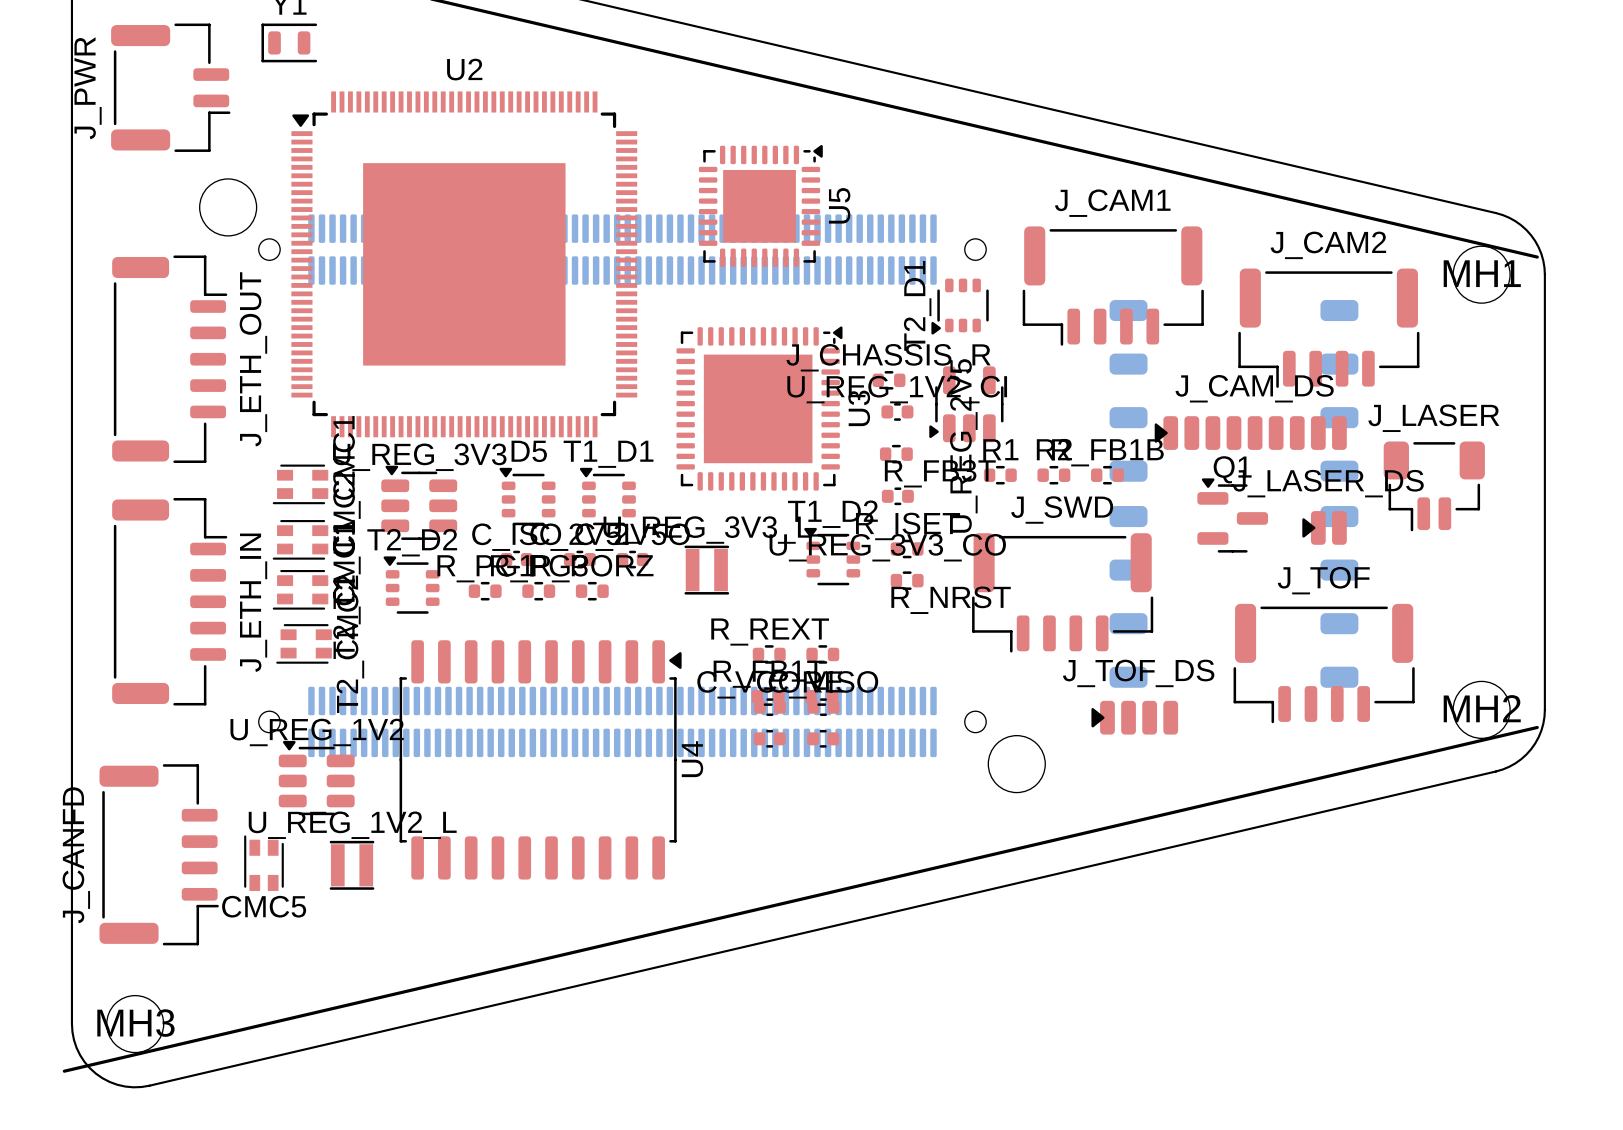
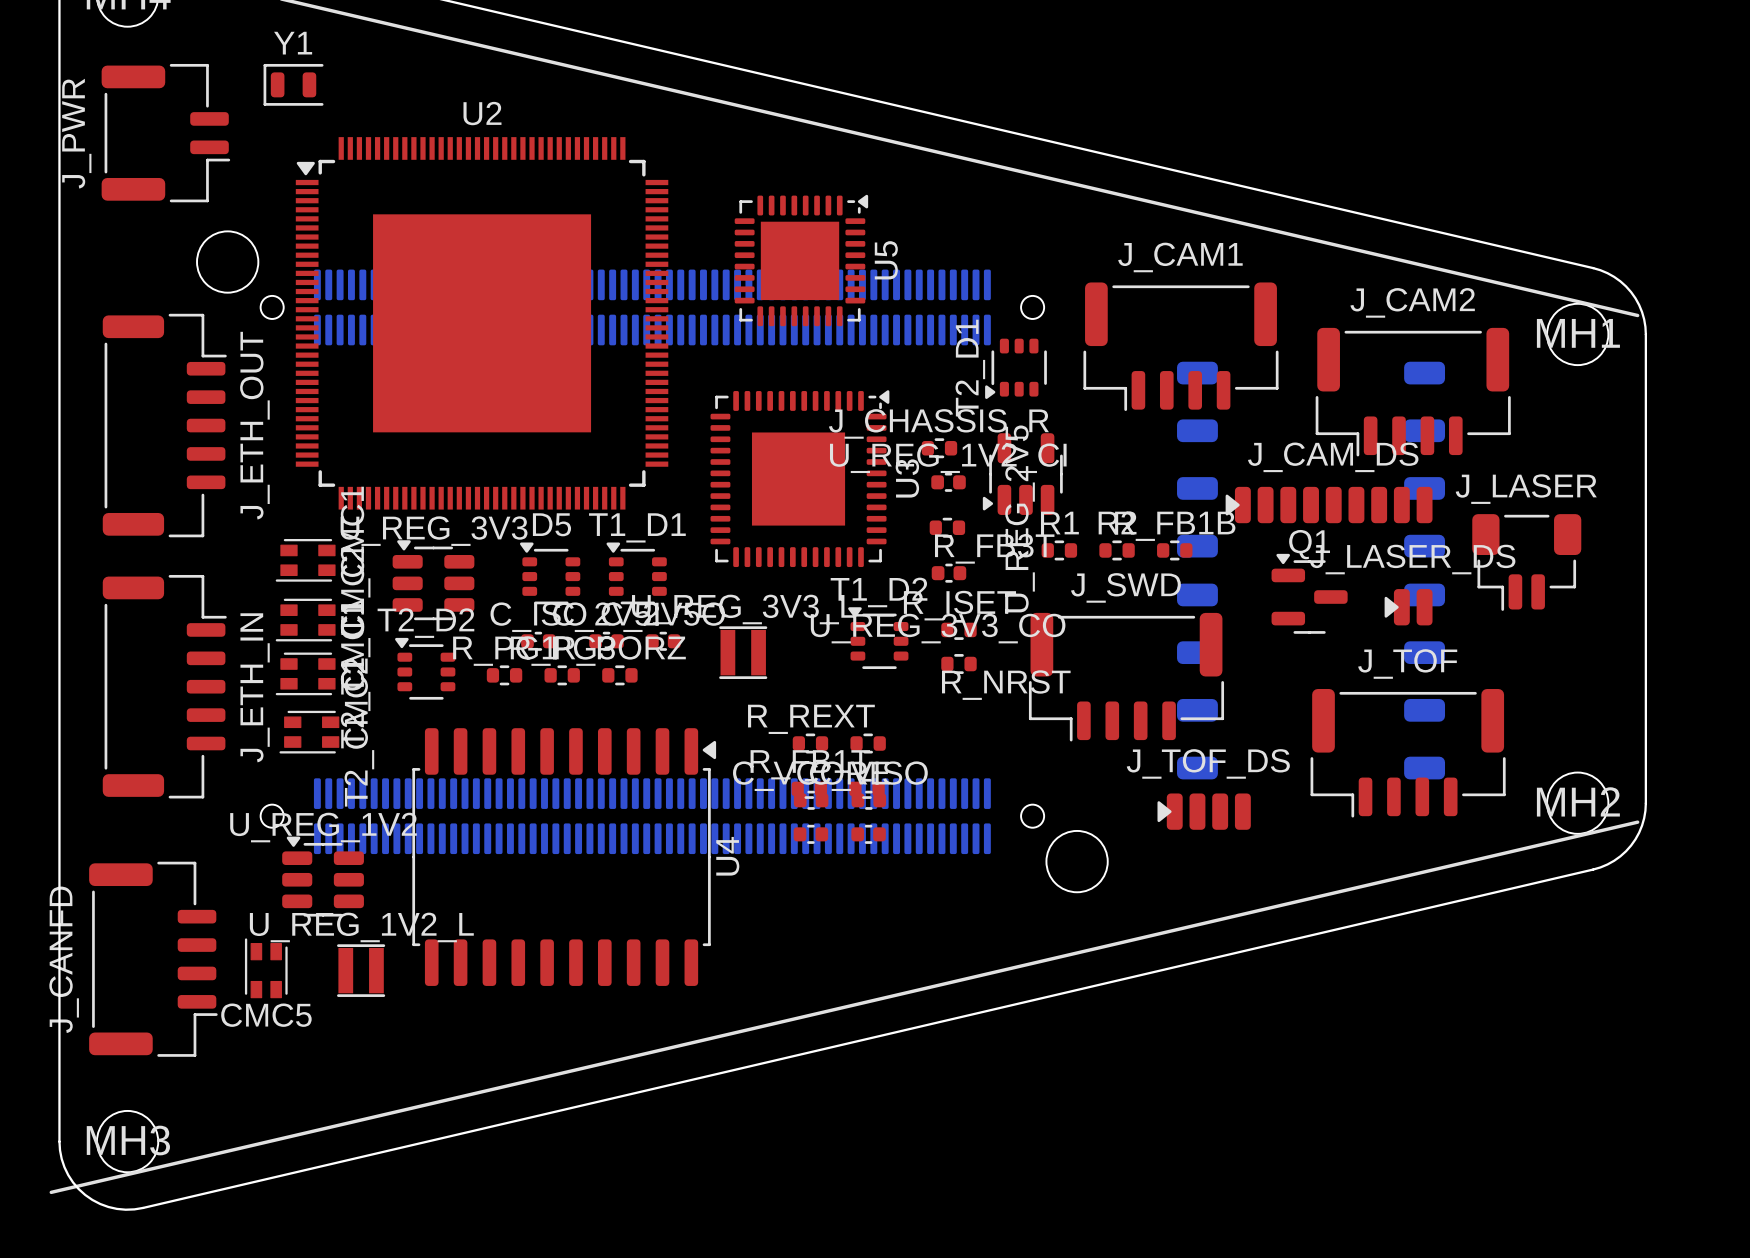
U3 footprint: [676, 326, 843, 491] -> [710, 390, 890, 568]

